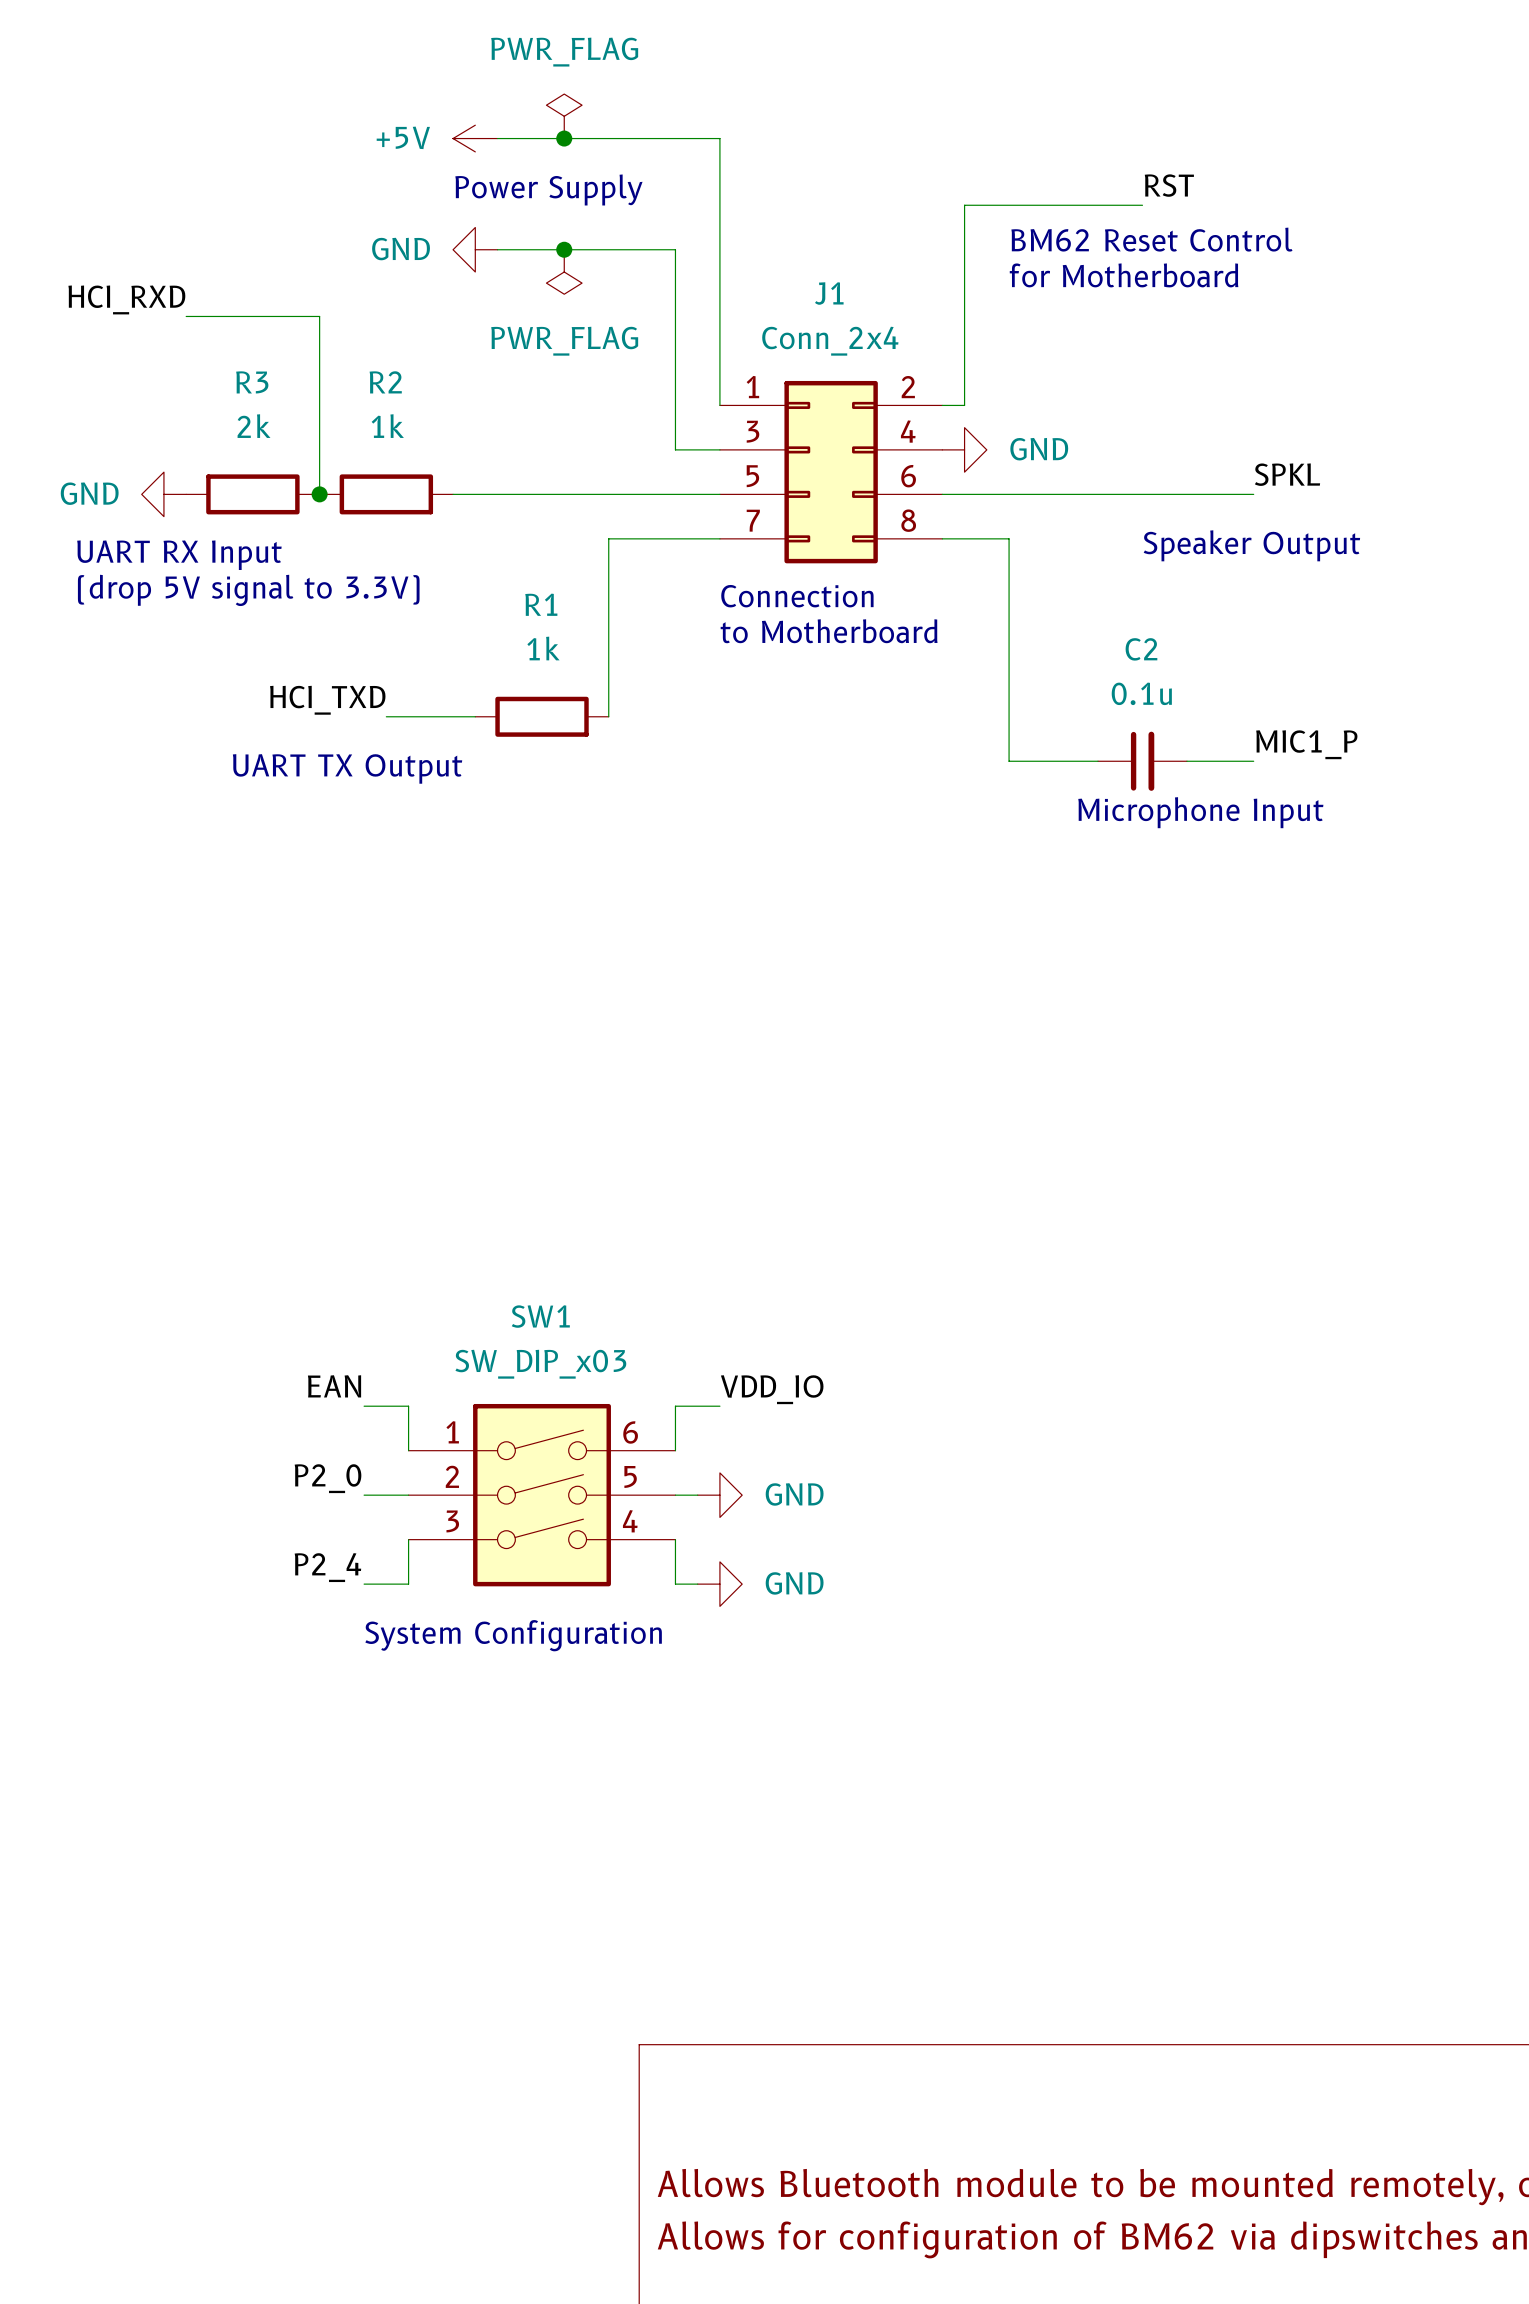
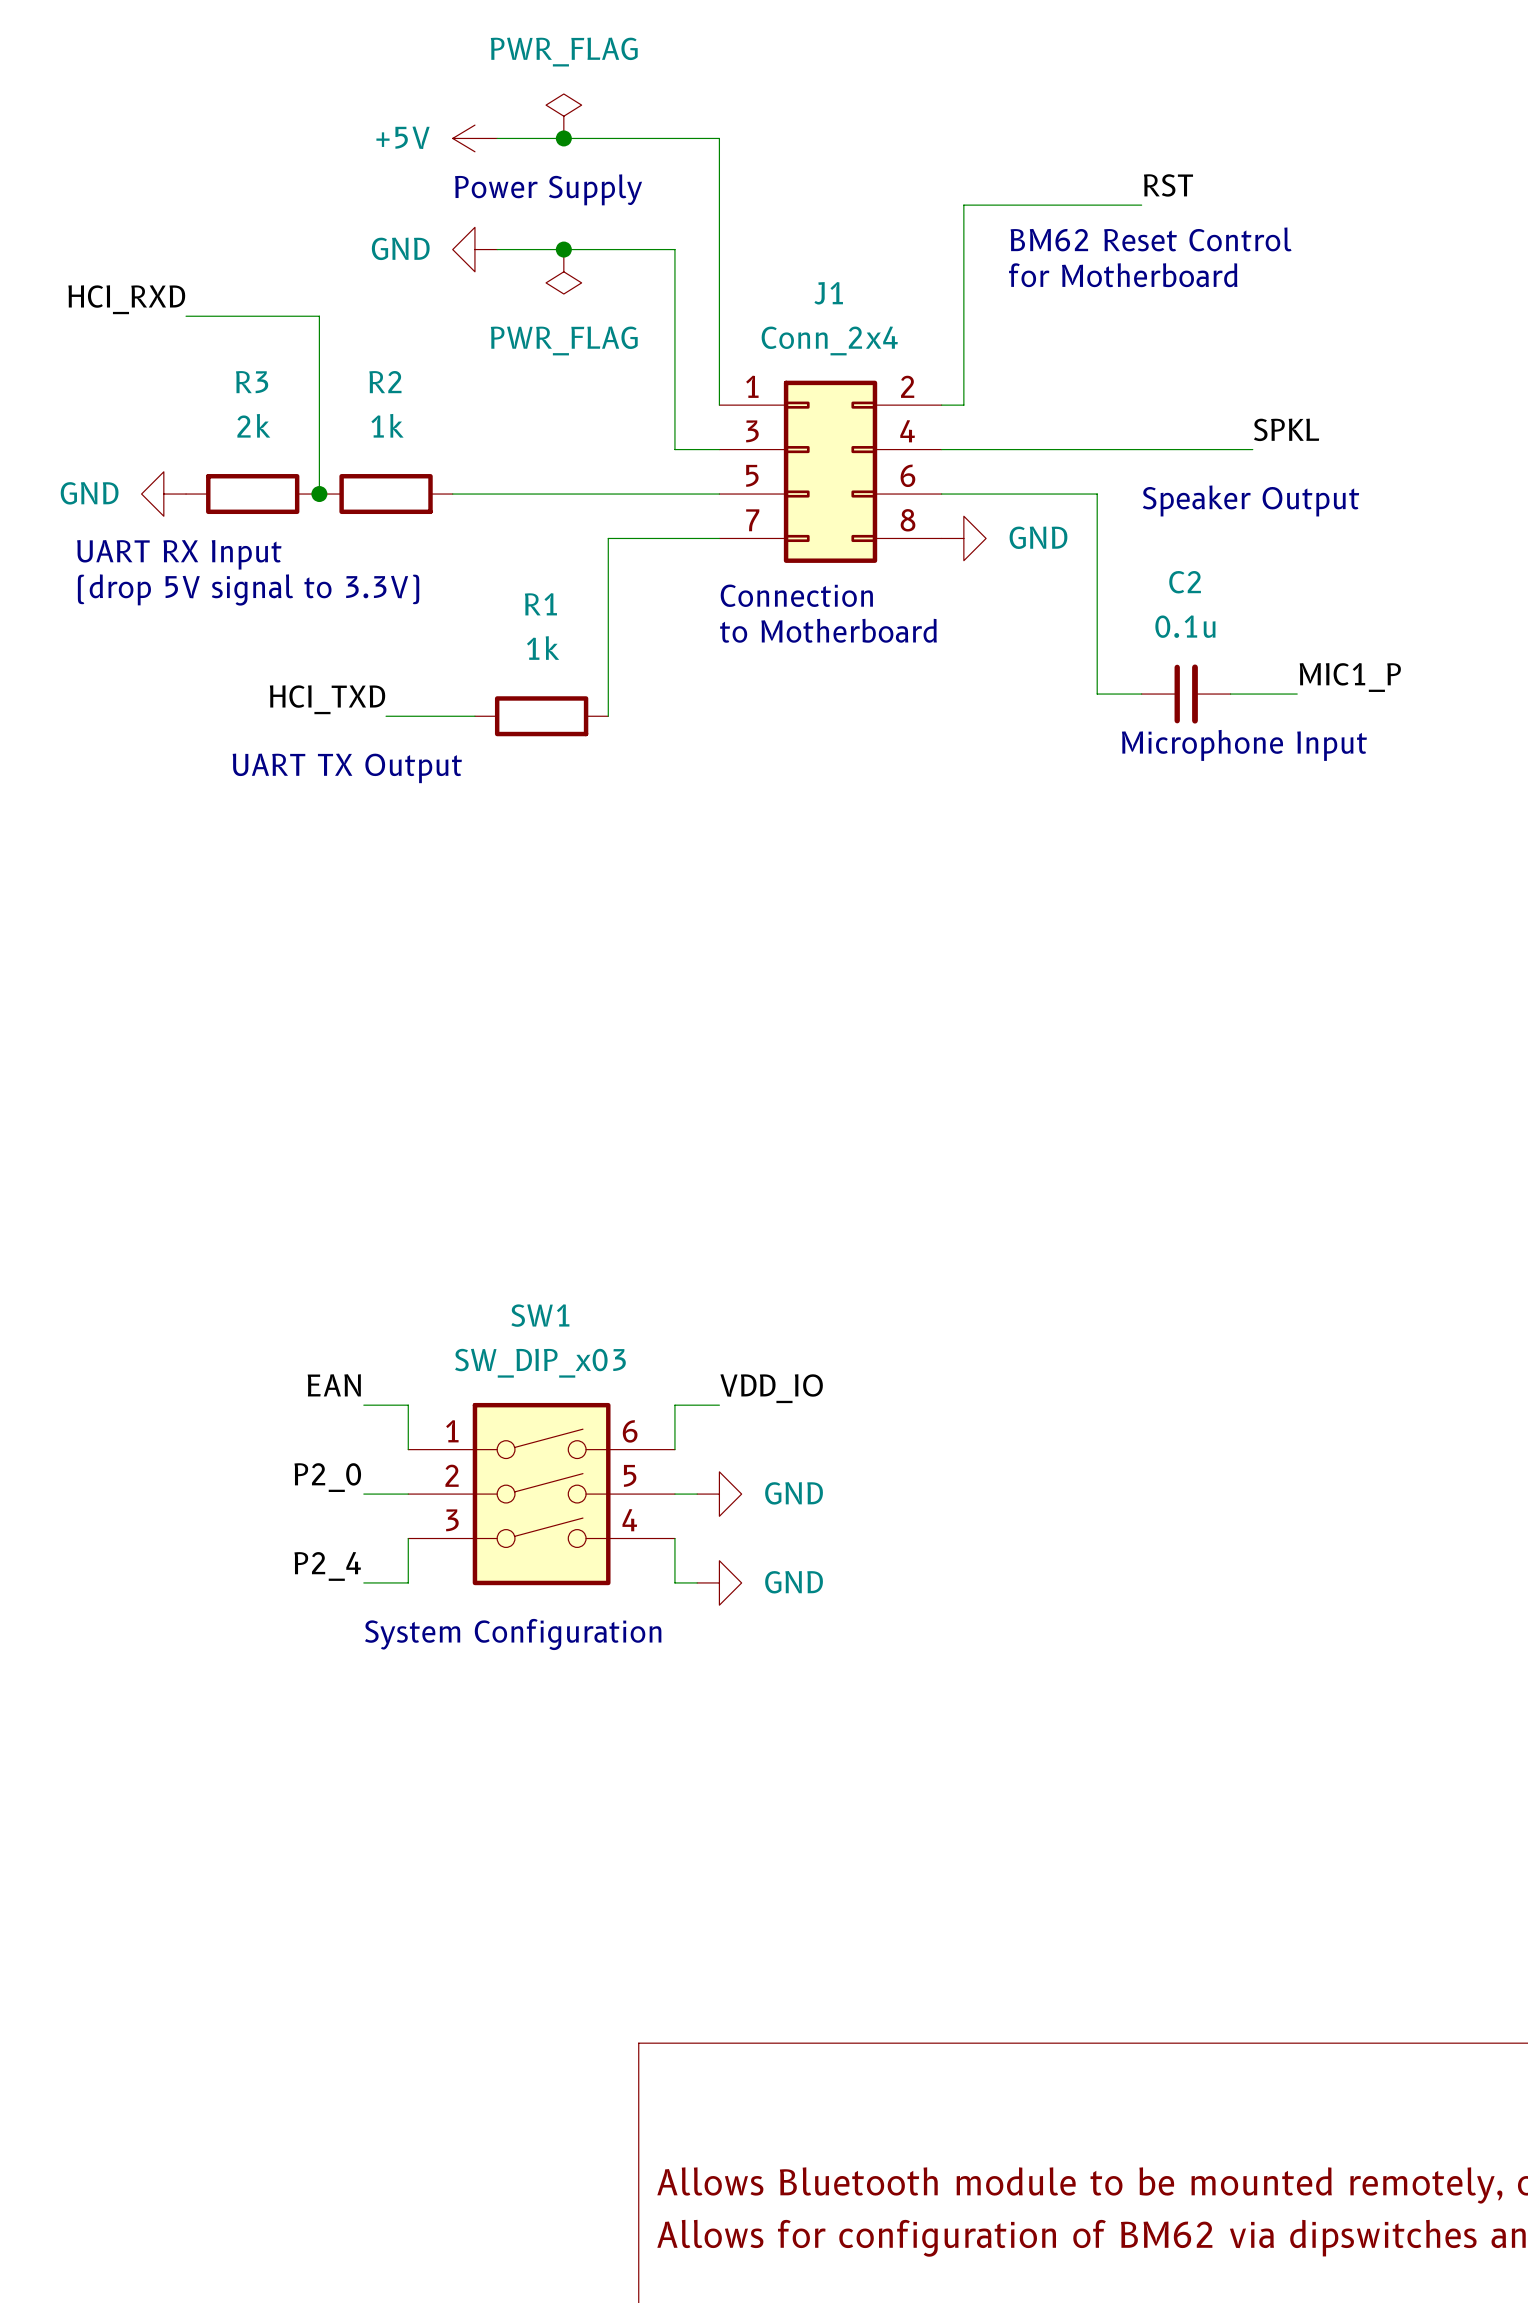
wire: none -> (941, 449) (1252, 449)
power symbol position: GND (964, 449) -> GND (963, 538)
label position: SPKL (1287, 474) -> SPKL (1286, 429)
wire: (1098, 494) (1253, 494) -> (1097, 494) (1097, 694) (1141, 694)
wire: (942, 538) (1009, 538) (1009, 761) (1098, 761) -> none
text position: Speaker Output (1251, 545) -> Speaker Output (1250, 500)
label position: MIC1_P (1306, 744) -> MIC1_P (1350, 677)
C2 position: (1142, 761) -> (1186, 694)
wire: (1186, 761) (1253, 761) -> (1230, 694) (1297, 694)
text position: Microphone Input (1200, 812) -> Microphone Input (1244, 745)

